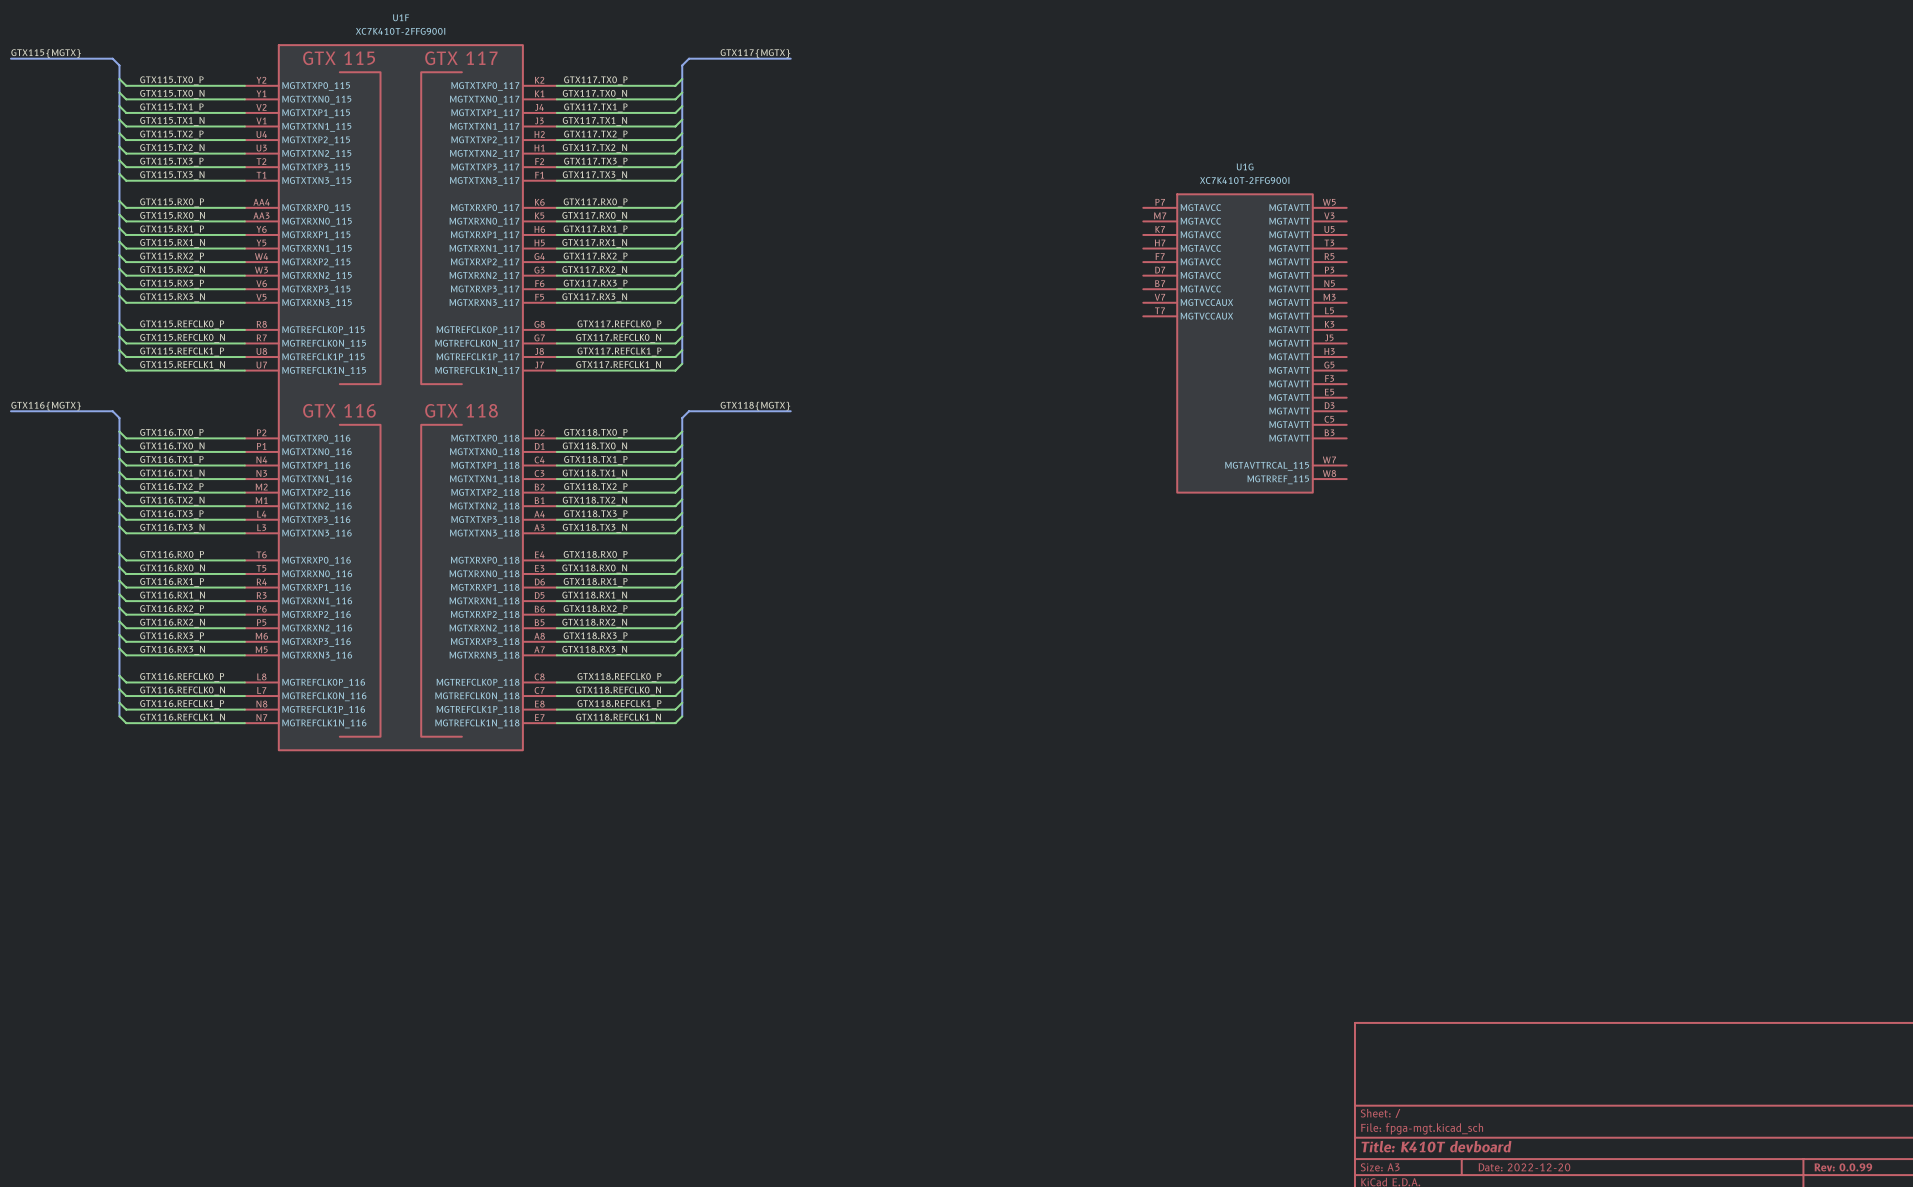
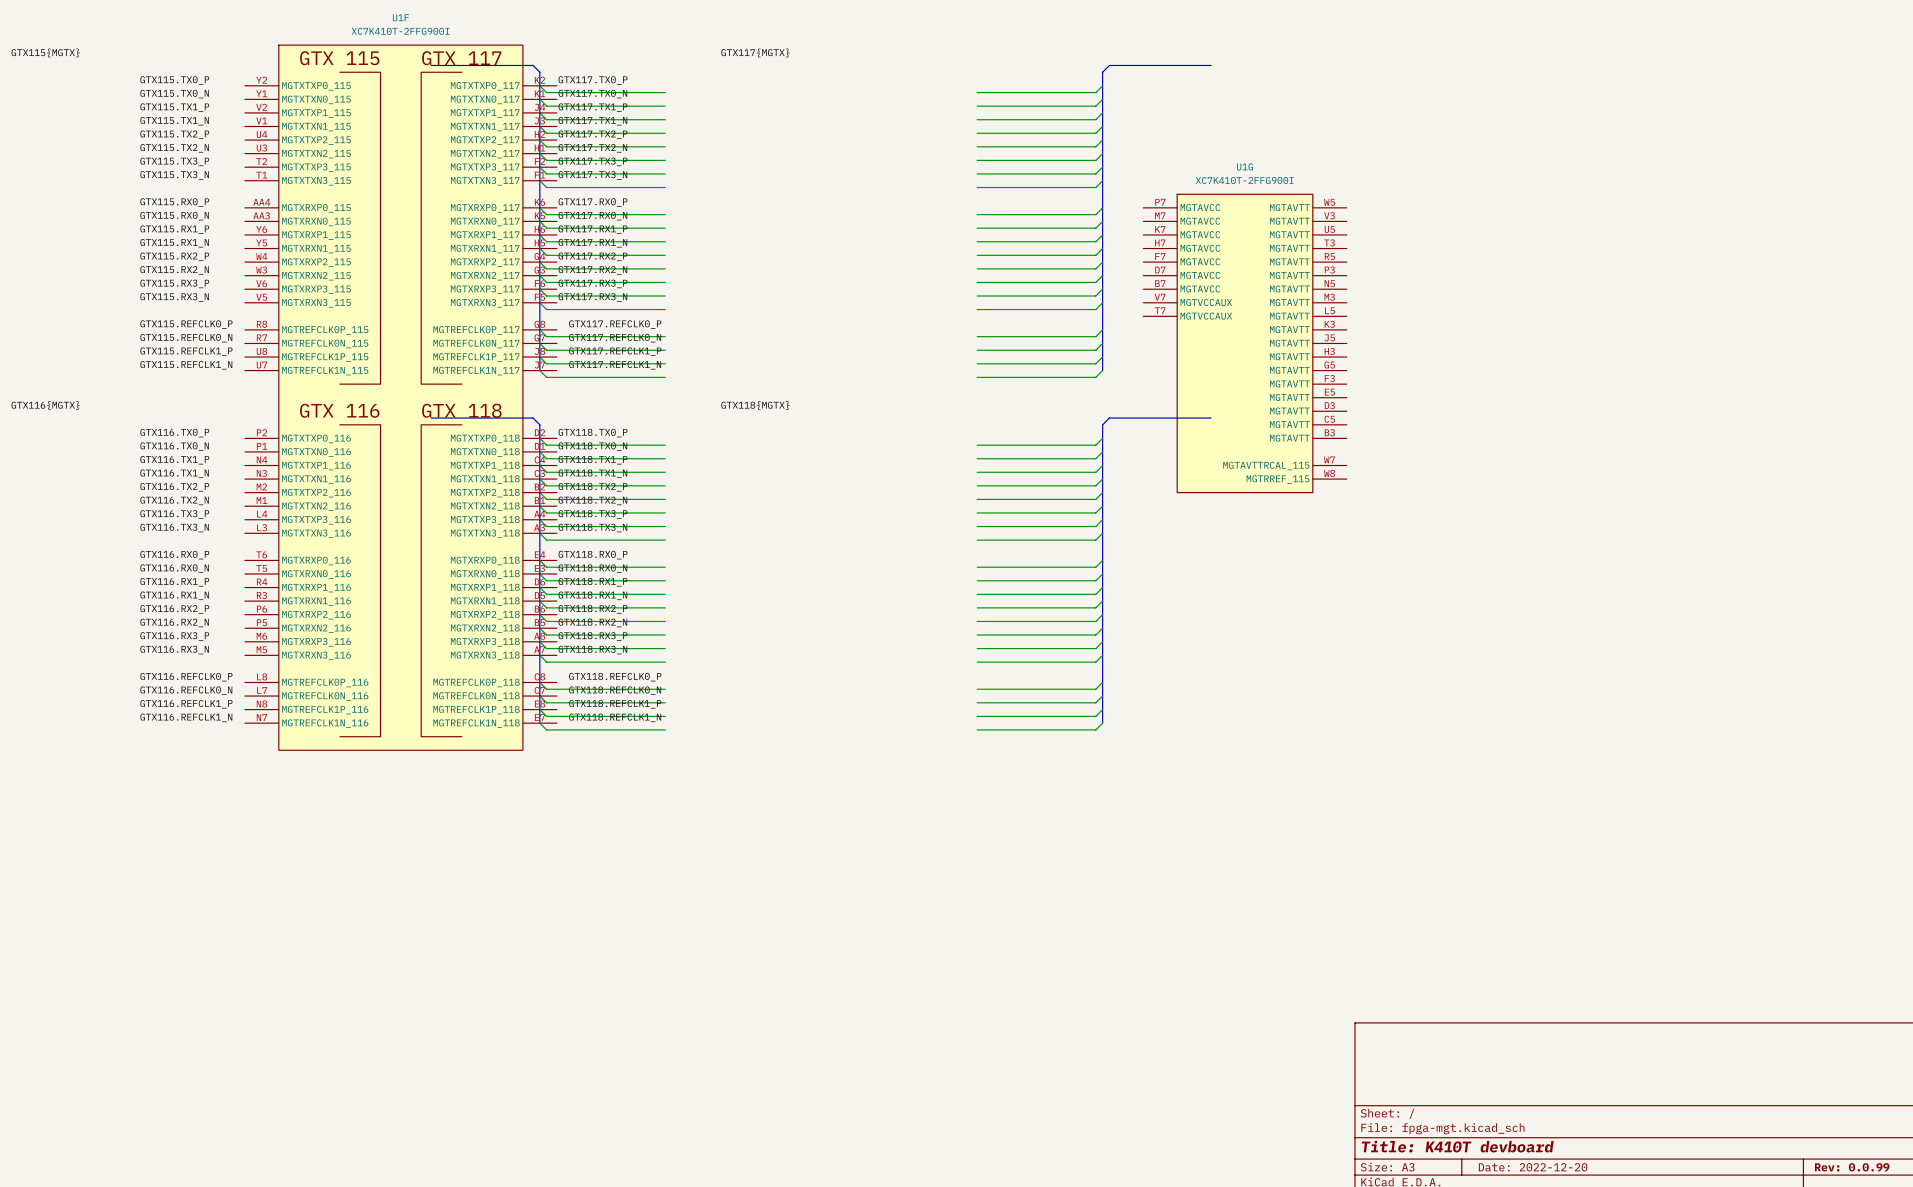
bus: (10, 58) (112, 58) (119, 65) (119, 363) -> none
bus: (790, 58) (689, 58) (682, 65) (682, 363) -> none
bus: none -> (431, 65) (533, 65) (539, 72) (539, 370)
bus: none -> (1211, 65) (1109, 65) (1102, 72) (1102, 370)
wire: (119, 79) (126, 85) (244, 85) -> none
wire: (682, 79) (675, 85) (556, 85) -> none
wire: none -> (539, 85) (546, 92) (665, 92)
wire: none -> (1102, 85) (1095, 92) (977, 92)
wire: (119, 92) (126, 99) (244, 99) -> none
wire: (682, 92) (675, 99) (556, 99) -> none
wire: none -> (539, 99) (546, 106) (665, 106)
wire: none -> (1102, 99) (1095, 106) (977, 106)
wire: (119, 106) (126, 112) (244, 112) -> none
wire: (682, 106) (675, 112) (556, 112) -> none
wire: none -> (539, 112) (546, 119) (665, 119)
wire: none -> (1102, 112) (1095, 119) (977, 119)
wire: (119, 119) (126, 126) (244, 126) -> none
wire: (682, 119) (675, 126) (556, 126) -> none
wire: none -> (539, 126) (546, 133) (665, 133)
wire: none -> (1102, 126) (1095, 133) (977, 133)
wire: (119, 133) (126, 140) (244, 140) -> none
wire: (682, 133) (675, 140) (556, 140) -> none
wire: none -> (539, 140) (546, 146) (665, 146)
wire: none -> (1102, 140) (1095, 146) (977, 146)
wire: (119, 146) (126, 153) (244, 153) -> none
wire: (682, 146) (675, 153) (556, 153) -> none
wire: none -> (539, 153) (546, 160) (665, 160)
wire: none -> (1102, 153) (1095, 160) (977, 160)
wire: (119, 160) (126, 167) (244, 167) -> none
wire: (682, 160) (675, 167) (556, 167) -> none
wire: none -> (539, 167) (546, 173) (665, 173)
wire: none -> (1102, 167) (1095, 173) (977, 173)
wire: (119, 173) (126, 180) (244, 180) -> none
wire: (682, 173) (675, 180) (556, 180) -> none
wire: none -> (539, 180) (546, 187) (665, 187)
wire: none -> (1102, 180) (1095, 187) (977, 187)
wire: (119, 201) (126, 207) (244, 207) -> none
wire: (682, 201) (675, 207) (556, 207) -> none
wire: none -> (539, 207) (546, 214) (665, 214)
wire: none -> (1102, 207) (1095, 214) (977, 214)
wire: (119, 214) (126, 221) (244, 221) -> none
wire: (682, 214) (675, 221) (556, 221) -> none
wire: none -> (539, 221) (546, 228) (665, 228)
wire: none -> (1102, 221) (1095, 228) (977, 228)
wire: (119, 228) (126, 234) (244, 234) -> none
wire: (682, 228) (675, 234) (556, 234) -> none
wire: none -> (539, 234) (546, 241) (665, 241)
wire: none -> (1102, 234) (1095, 241) (977, 241)
wire: (119, 241) (126, 248) (244, 248) -> none
wire: (682, 241) (675, 248) (556, 248) -> none
wire: none -> (539, 248) (546, 255) (665, 255)
wire: none -> (1102, 248) (1095, 255) (977, 255)
wire: (119, 255) (126, 262) (244, 262) -> none
wire: (682, 255) (675, 262) (556, 262) -> none
wire: none -> (539, 262) (546, 268) (665, 268)
wire: none -> (1102, 262) (1095, 268) (977, 268)
wire: (119, 268) (126, 275) (244, 275) -> none
wire: (682, 268) (675, 275) (556, 275) -> none
wire: none -> (539, 275) (546, 282) (665, 282)
wire: none -> (1102, 275) (1095, 282) (977, 282)
wire: (119, 282) (126, 289) (244, 289) -> none
wire: (682, 282) (675, 289) (556, 289) -> none
wire: none -> (539, 289) (546, 296) (665, 296)
wire: none -> (1102, 289) (1095, 296) (977, 296)
wire: (119, 296) (126, 302) (244, 302) -> none
wire: (682, 296) (675, 302) (556, 302) -> none
wire: none -> (539, 302) (546, 309) (665, 309)
wire: none -> (1102, 302) (1095, 309) (977, 309)
wire: (119, 323) (126, 329) (244, 329) -> none
wire: (682, 323) (675, 329) (556, 329) -> none
wire: none -> (539, 329) (546, 336) (665, 336)
wire: none -> (1102, 329) (1095, 336) (977, 336)
wire: (119, 336) (126, 343) (244, 343) -> none
wire: (682, 336) (675, 343) (556, 343) -> none
wire: none -> (539, 343) (546, 350) (665, 350)
wire: none -> (1102, 343) (1095, 350) (977, 350)
wire: (119, 350) (126, 357) (244, 357) -> none
wire: (682, 350) (675, 357) (556, 357) -> none
wire: none -> (539, 357) (546, 363) (665, 363)
wire: none -> (1102, 357) (1095, 363) (977, 363)
wire: (119, 363) (126, 370) (244, 370) -> none
wire: (682, 363) (675, 370) (556, 370) -> none
wire: none -> (539, 370) (546, 377) (665, 377)
wire: none -> (1102, 370) (1095, 377) (977, 377)
bus: (10, 411) (112, 411) (119, 418) (119, 716) -> none
bus: (790, 411) (689, 411) (682, 418) (682, 716) -> none
bus: none -> (431, 418) (533, 418) (539, 424) (539, 723)
bus: none -> (1211, 418) (1109, 418) (1102, 424) (1102, 723)
wire: (119, 431) (126, 438) (244, 438) -> none
wire: (682, 431) (675, 438) (556, 438) -> none
wire: none -> (539, 438) (546, 445) (665, 445)
wire: none -> (1102, 438) (1095, 445) (977, 445)
wire: (119, 445) (126, 451) (244, 451) -> none
wire: (682, 445) (675, 451) (556, 451) -> none
wire: none -> (539, 451) (546, 458) (665, 458)
wire: none -> (1102, 451) (1095, 458) (977, 458)
wire: (119, 458) (126, 465) (244, 465) -> none
wire: (682, 458) (675, 465) (556, 465) -> none
wire: none -> (539, 465) (546, 472) (665, 472)
wire: none -> (1102, 465) (1095, 472) (977, 472)
wire: (119, 472) (126, 479) (244, 479) -> none
wire: (682, 472) (675, 479) (556, 479) -> none
wire: none -> (539, 479) (546, 485) (665, 485)
wire: none -> (1102, 479) (1095, 485) (977, 485)
wire: (119, 485) (126, 492) (244, 492) -> none
wire: (682, 485) (675, 492) (556, 492) -> none
wire: none -> (539, 492) (546, 499) (665, 499)
wire: none -> (1102, 492) (1095, 499) (977, 499)
wire: (119, 499) (126, 506) (244, 506) -> none
wire: (682, 499) (675, 506) (556, 506) -> none
wire: none -> (539, 506) (546, 512) (665, 512)
wire: none -> (1102, 506) (1095, 512) (977, 512)
wire: (119, 512) (126, 519) (244, 519) -> none
wire: (682, 512) (675, 519) (556, 519) -> none
wire: none -> (539, 519) (546, 526) (665, 526)
wire: none -> (1102, 519) (1095, 526) (977, 526)
wire: (119, 526) (126, 533) (244, 533) -> none
wire: (682, 526) (675, 533) (556, 533) -> none
wire: none -> (539, 533) (546, 540) (665, 540)
wire: none -> (1102, 533) (1095, 540) (977, 540)
wire: (119, 553) (126, 560) (244, 560) -> none
wire: (682, 553) (675, 560) (556, 560) -> none
wire: none -> (539, 560) (546, 567) (665, 567)
wire: none -> (1102, 560) (1095, 567) (977, 567)
wire: (119, 567) (126, 573) (244, 573) -> none
wire: (682, 567) (675, 573) (556, 573) -> none
wire: none -> (539, 573) (546, 580) (665, 580)
wire: none -> (1102, 573) (1095, 580) (977, 580)
wire: (119, 580) (126, 587) (244, 587) -> none
wire: (682, 580) (675, 587) (556, 587) -> none
wire: none -> (539, 587) (546, 594) (665, 594)
wire: none -> (1102, 587) (1095, 594) (977, 594)
wire: (119, 594) (126, 601) (244, 601) -> none
wire: (682, 594) (675, 601) (556, 601) -> none
wire: none -> (539, 601) (546, 607) (665, 607)
wire: none -> (1102, 601) (1095, 607) (977, 607)
wire: (119, 607) (126, 614) (244, 614) -> none
wire: (682, 607) (675, 614) (556, 614) -> none
wire: none -> (539, 614) (546, 621) (665, 621)
wire: none -> (1102, 614) (1095, 621) (977, 621)
wire: (119, 621) (126, 628) (244, 628) -> none
wire: (682, 621) (675, 628) (556, 628) -> none
wire: none -> (539, 628) (546, 635) (665, 635)
wire: none -> (1102, 628) (1095, 635) (977, 635)
wire: (119, 635) (126, 641) (244, 641) -> none
wire: (682, 635) (675, 641) (556, 641) -> none
wire: none -> (539, 641) (546, 648) (665, 648)
wire: none -> (1102, 641) (1095, 648) (977, 648)
wire: (119, 648) (126, 655) (244, 655) -> none
wire: (682, 648) (675, 655) (556, 655) -> none
wire: none -> (539, 655) (546, 662) (665, 662)
wire: none -> (1102, 655) (1095, 662) (977, 662)
wire: (119, 675) (126, 682) (244, 682) -> none
wire: (682, 675) (675, 682) (556, 682) -> none
wire: none -> (539, 682) (546, 689) (665, 689)
wire: none -> (1102, 682) (1095, 689) (977, 689)
wire: (119, 689) (126, 696) (244, 696) -> none
wire: (682, 689) (675, 696) (556, 696) -> none
wire: none -> (539, 696) (546, 702) (665, 702)
wire: none -> (1102, 696) (1095, 702) (977, 702)
wire: (119, 702) (126, 709) (244, 709) -> none
wire: (682, 702) (675, 709) (556, 709) -> none
wire: none -> (539, 709) (546, 716) (665, 716)
wire: none -> (1102, 709) (1095, 716) (977, 716)
wire: (119, 716) (126, 723) (244, 723) -> none
wire: (682, 716) (675, 723) (556, 723) -> none
wire: none -> (539, 723) (546, 729) (665, 729)
wire: none -> (1102, 723) (1095, 729) (977, 729)

